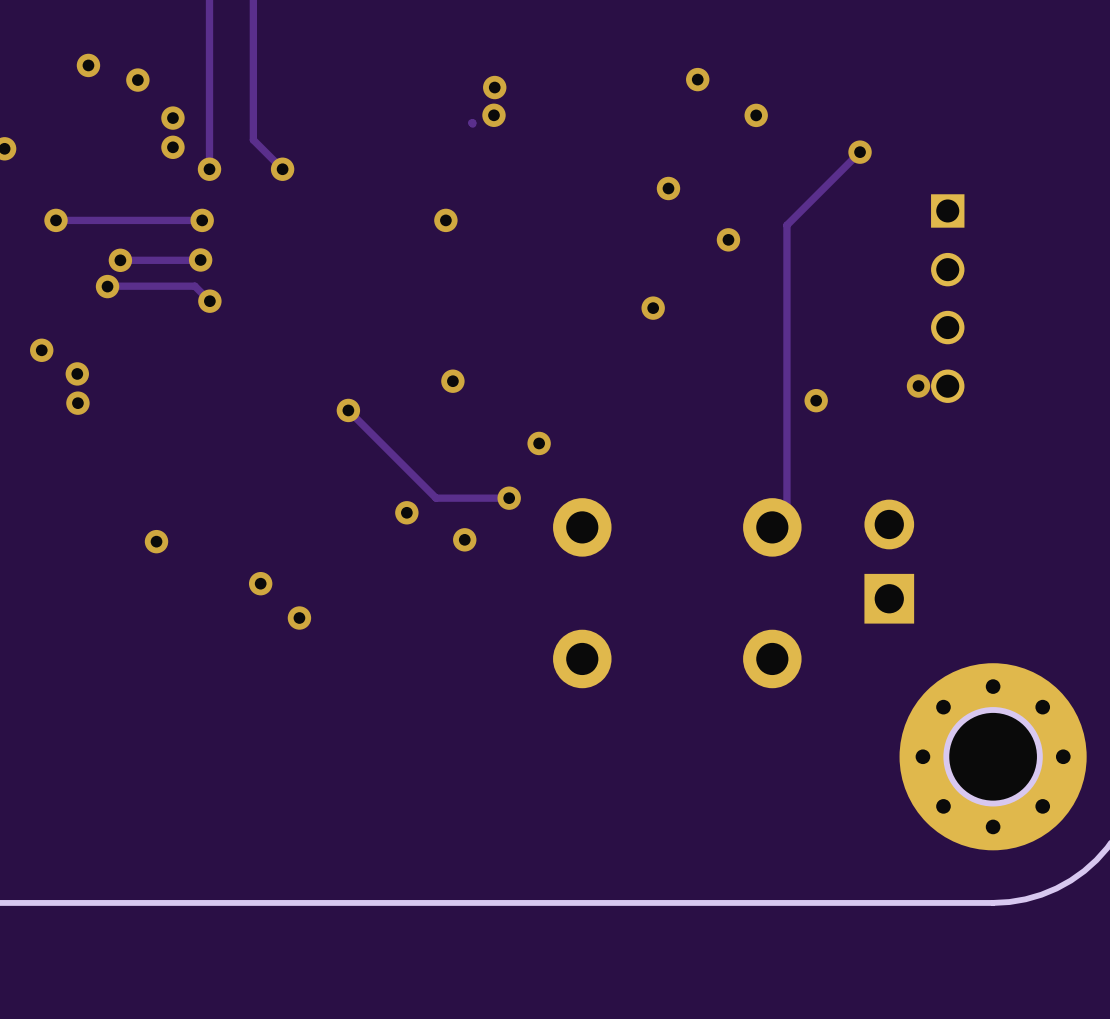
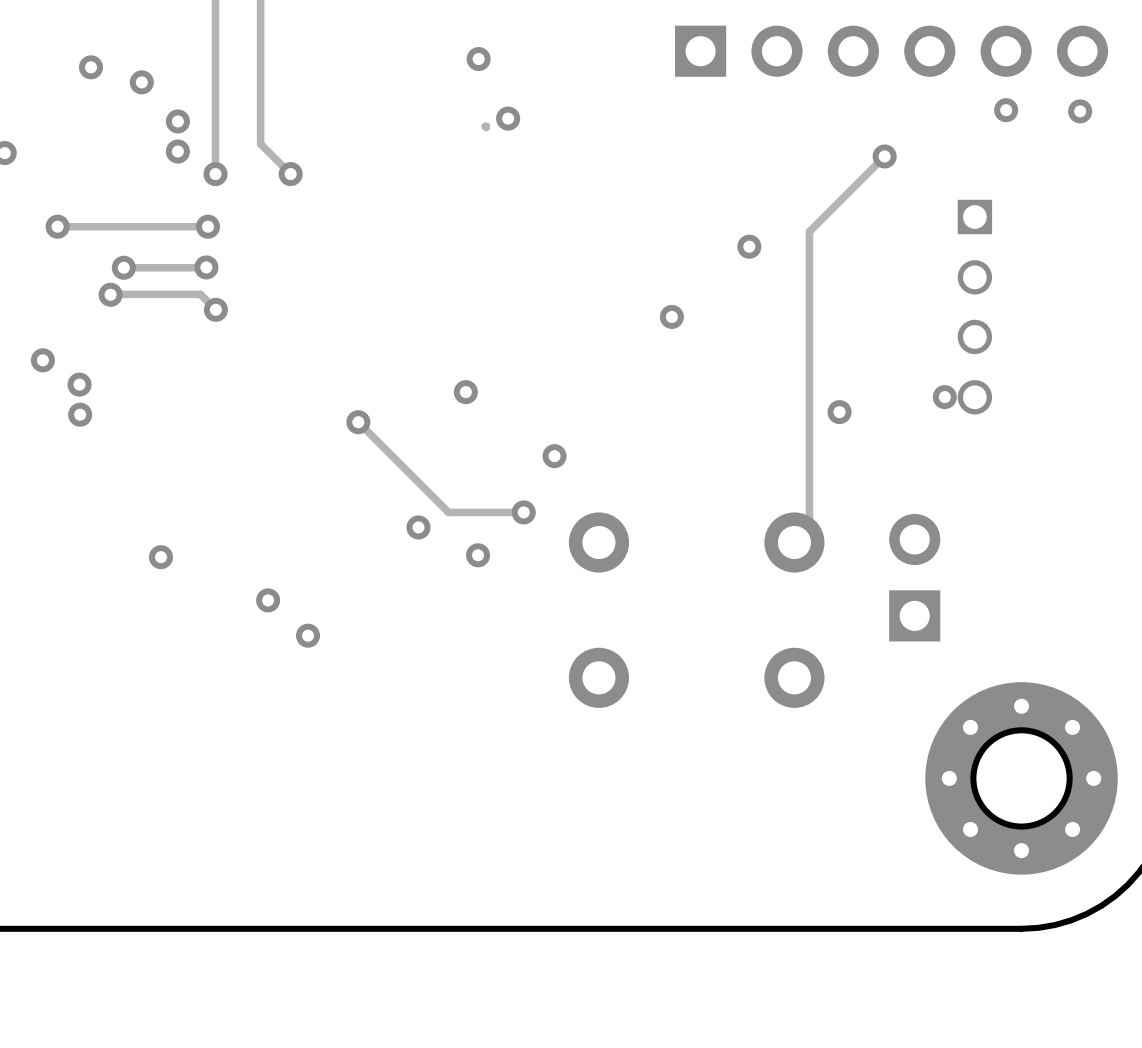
part: none -> (891, 51)
via: (697, 79) -> none
via position: (494, 87) -> (478, 59)
via: none -> (1006, 110)
via: none -> (1080, 111)
via: (756, 115) -> none
via: (668, 188) -> none
via: (445, 220) -> none

